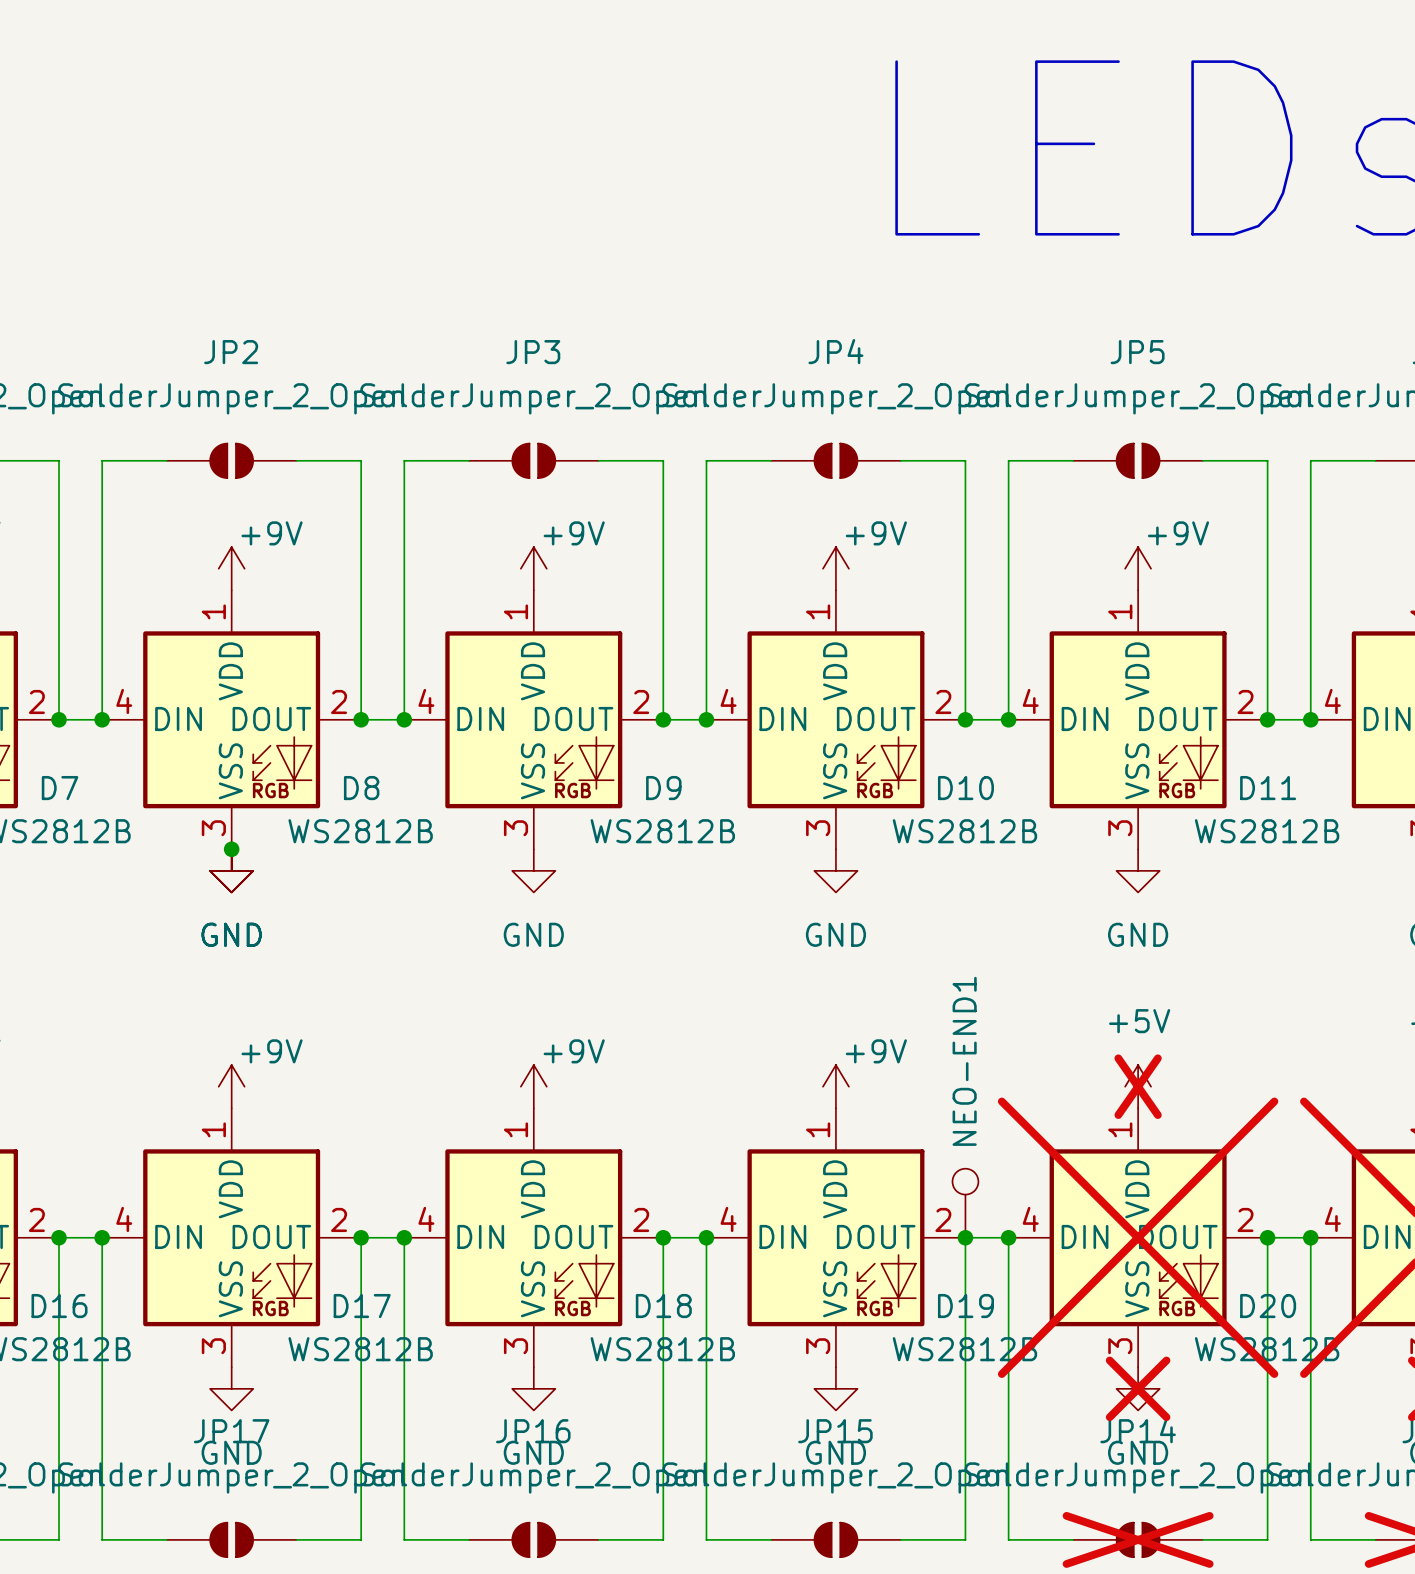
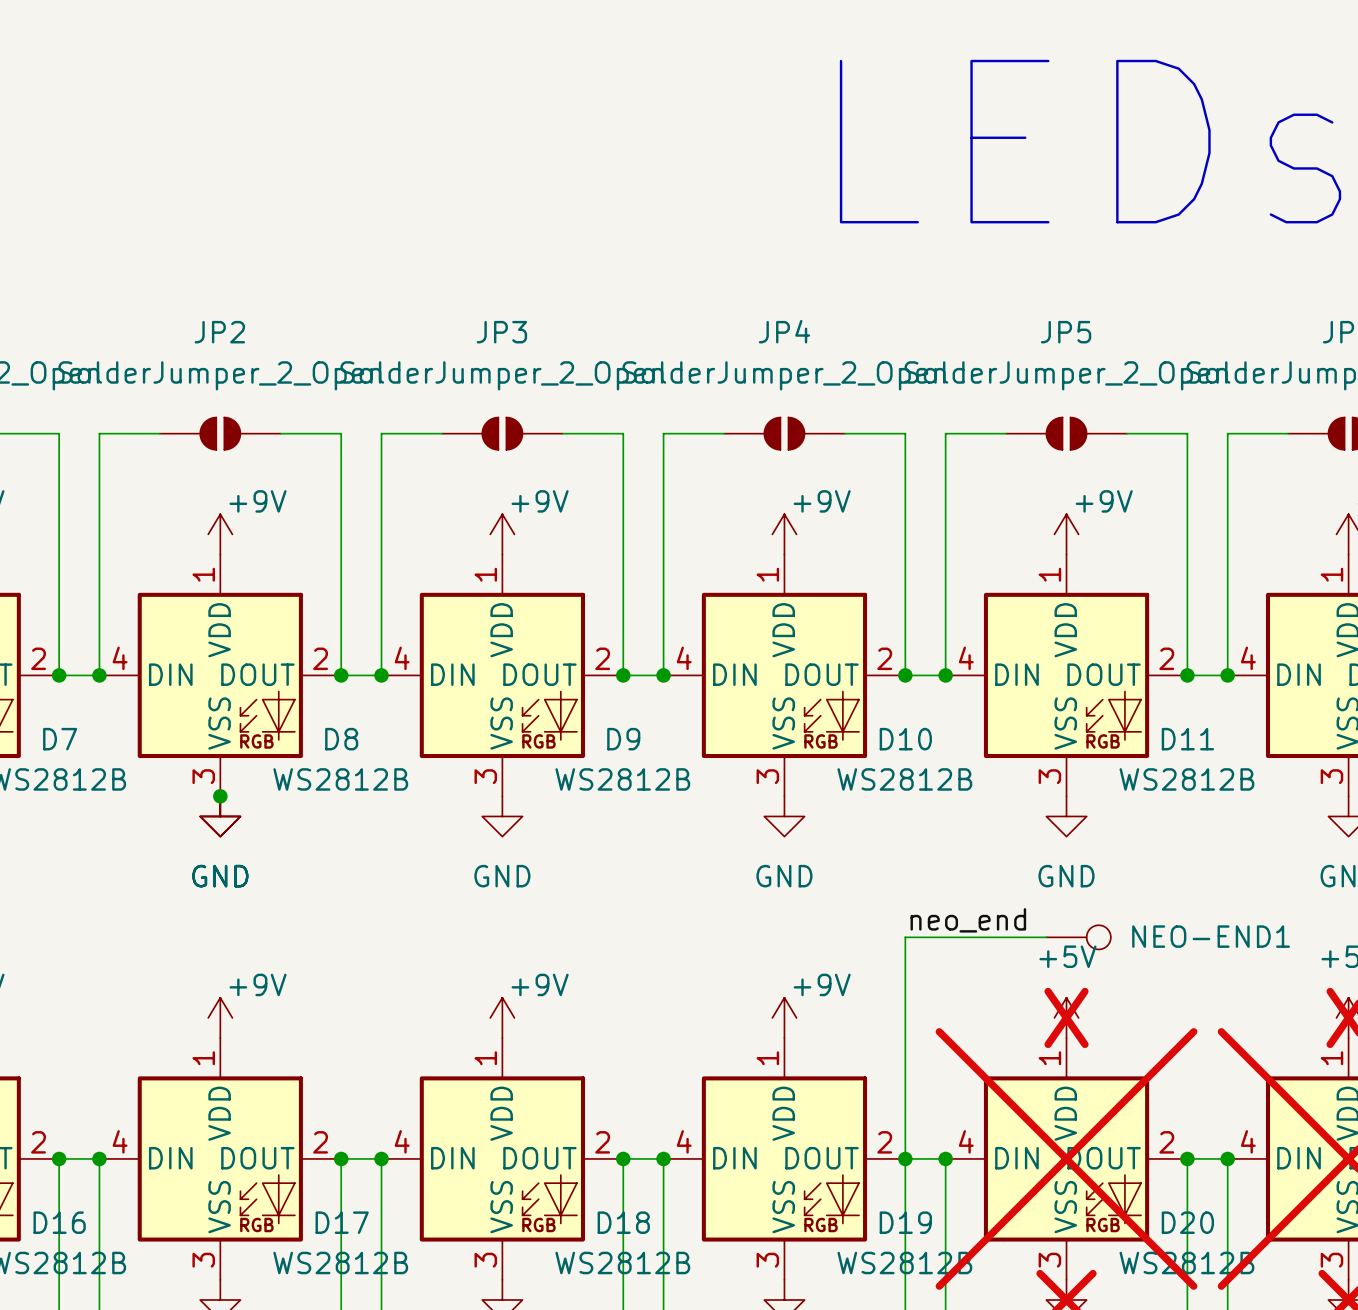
label: none -> neo_end (968, 920)
wire: none -> (1046, 937) (905, 937) (905, 1158)
NEO-END1 rotation: 0° (965, 1181) -> 90° clockwise (1098, 937)
NEO-END1 position: (965, 1203) -> (1078, 937)

